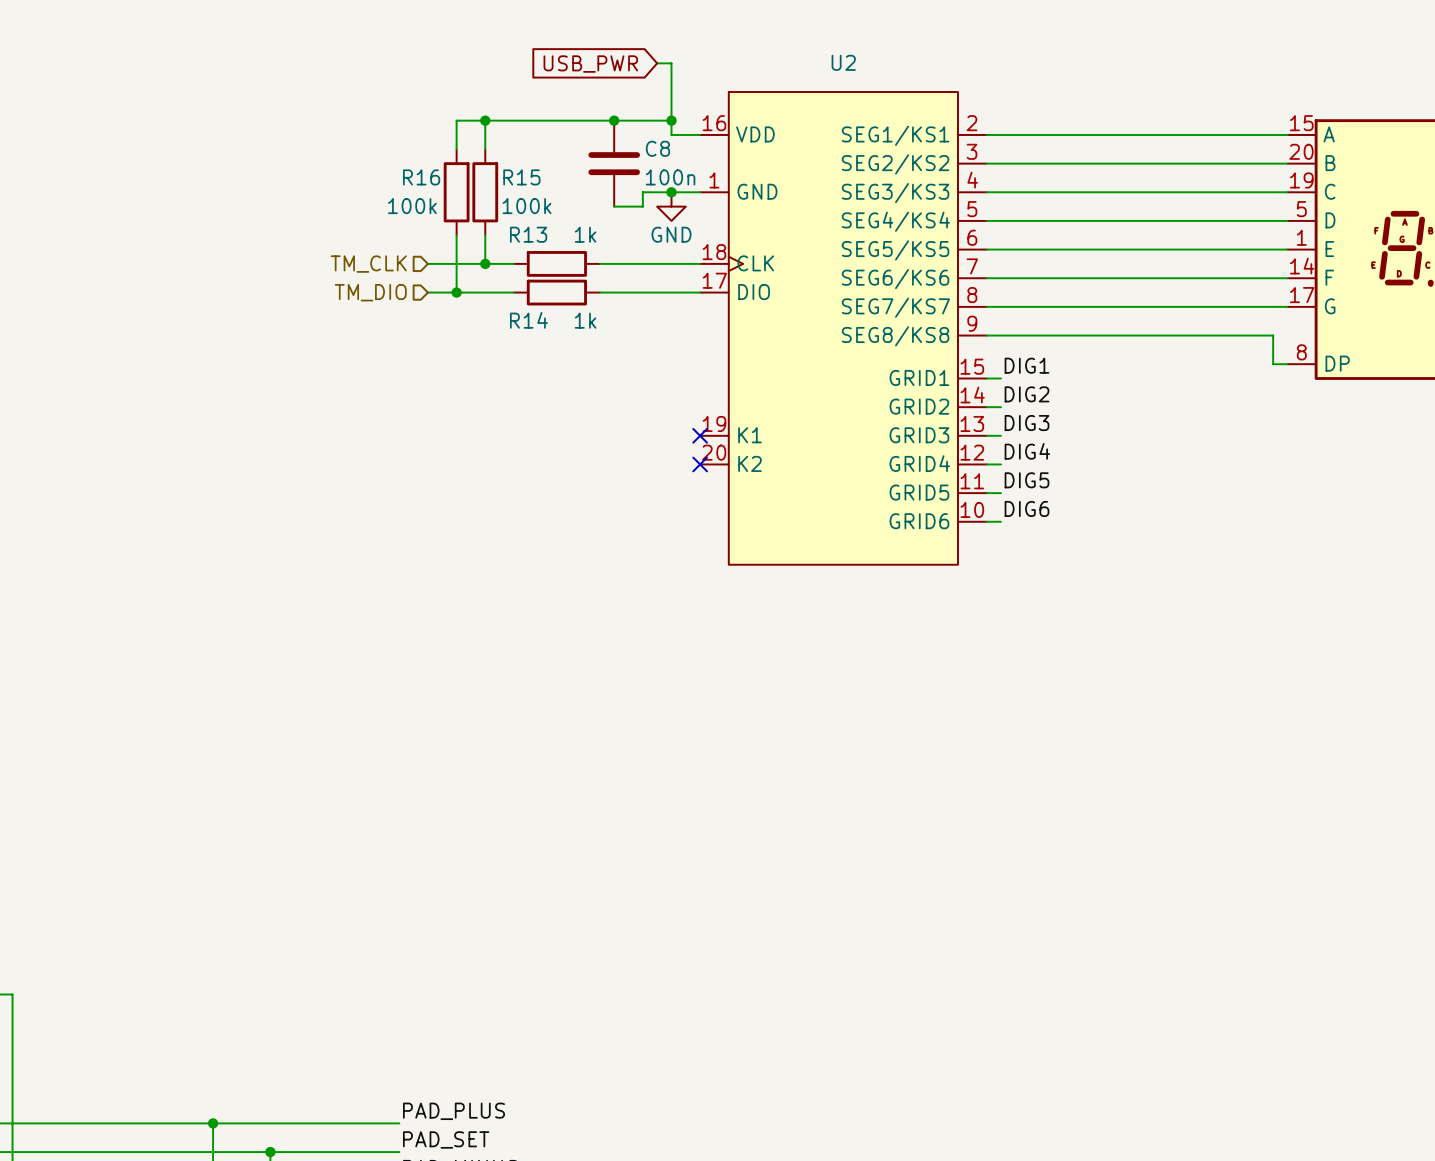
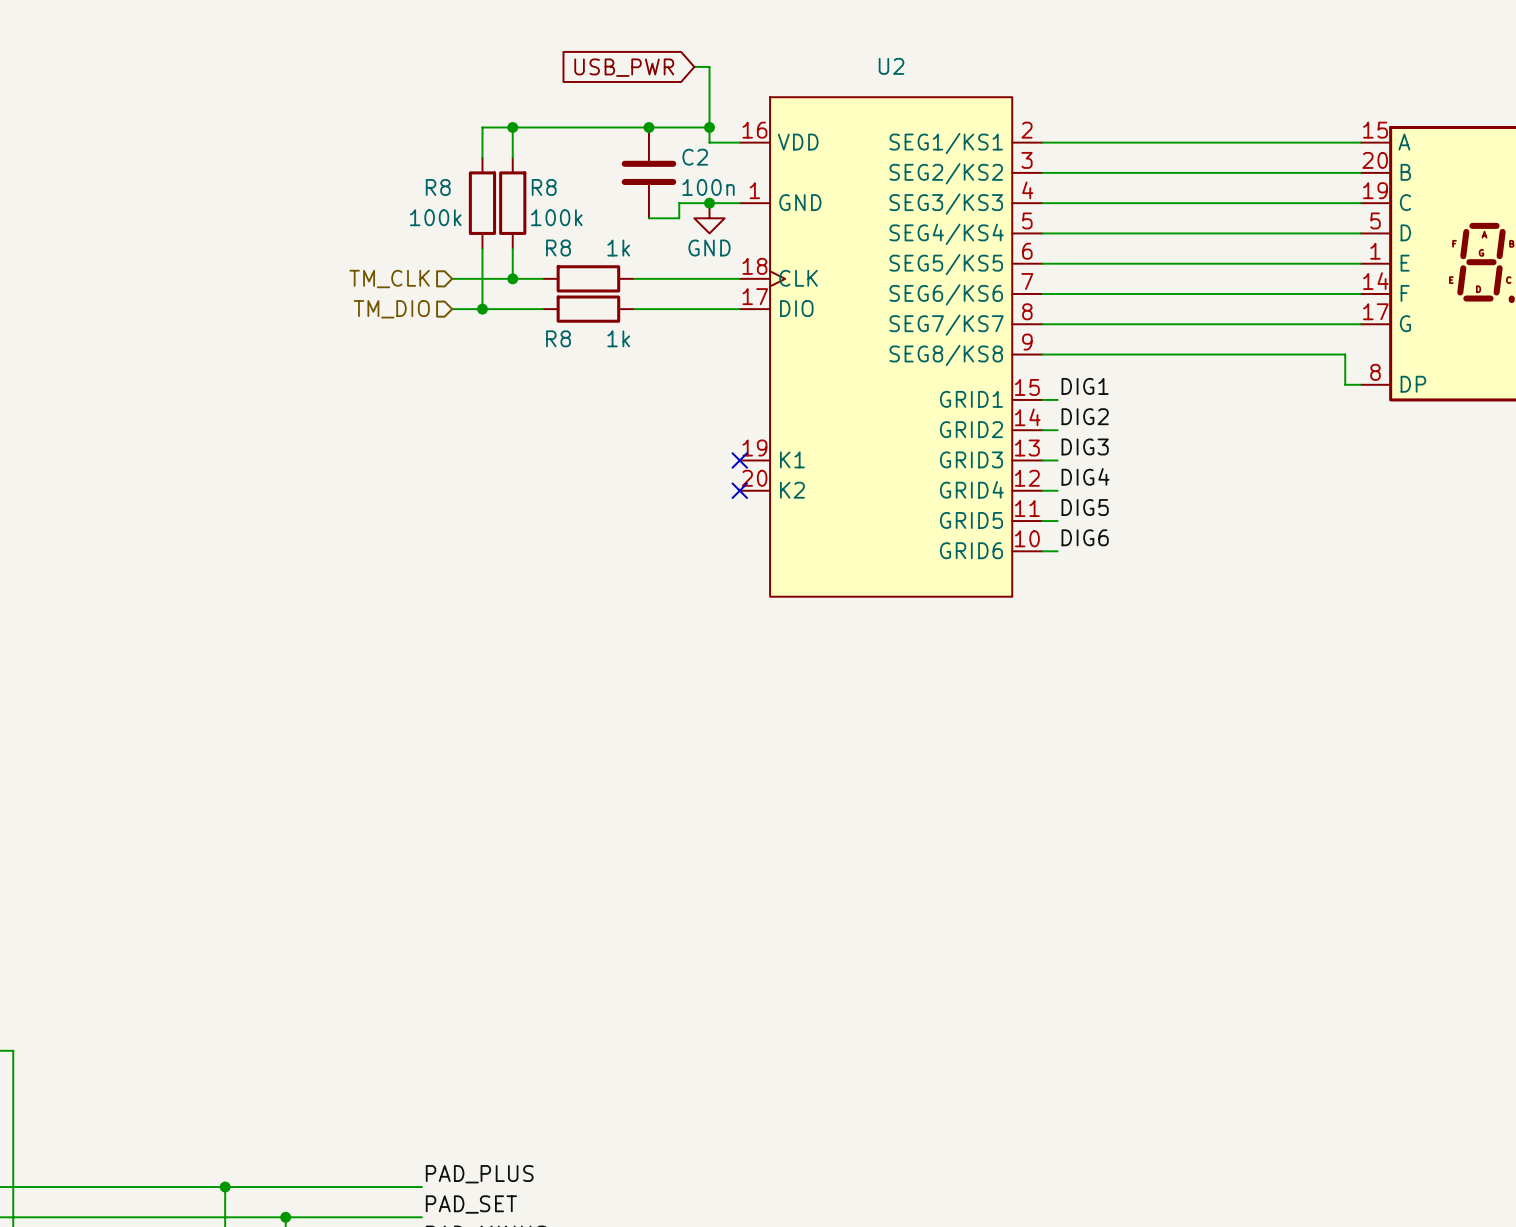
C8 name: C8 (657, 148) -> C2 (695, 157)
R16 name: R16 (421, 177) -> R8 (438, 187)
R15 name: R15 (521, 177) -> R8 (544, 187)
R13 name: R13 (528, 234) -> R8 (558, 248)
R14 name: R14 (528, 320) -> R8 (558, 338)

